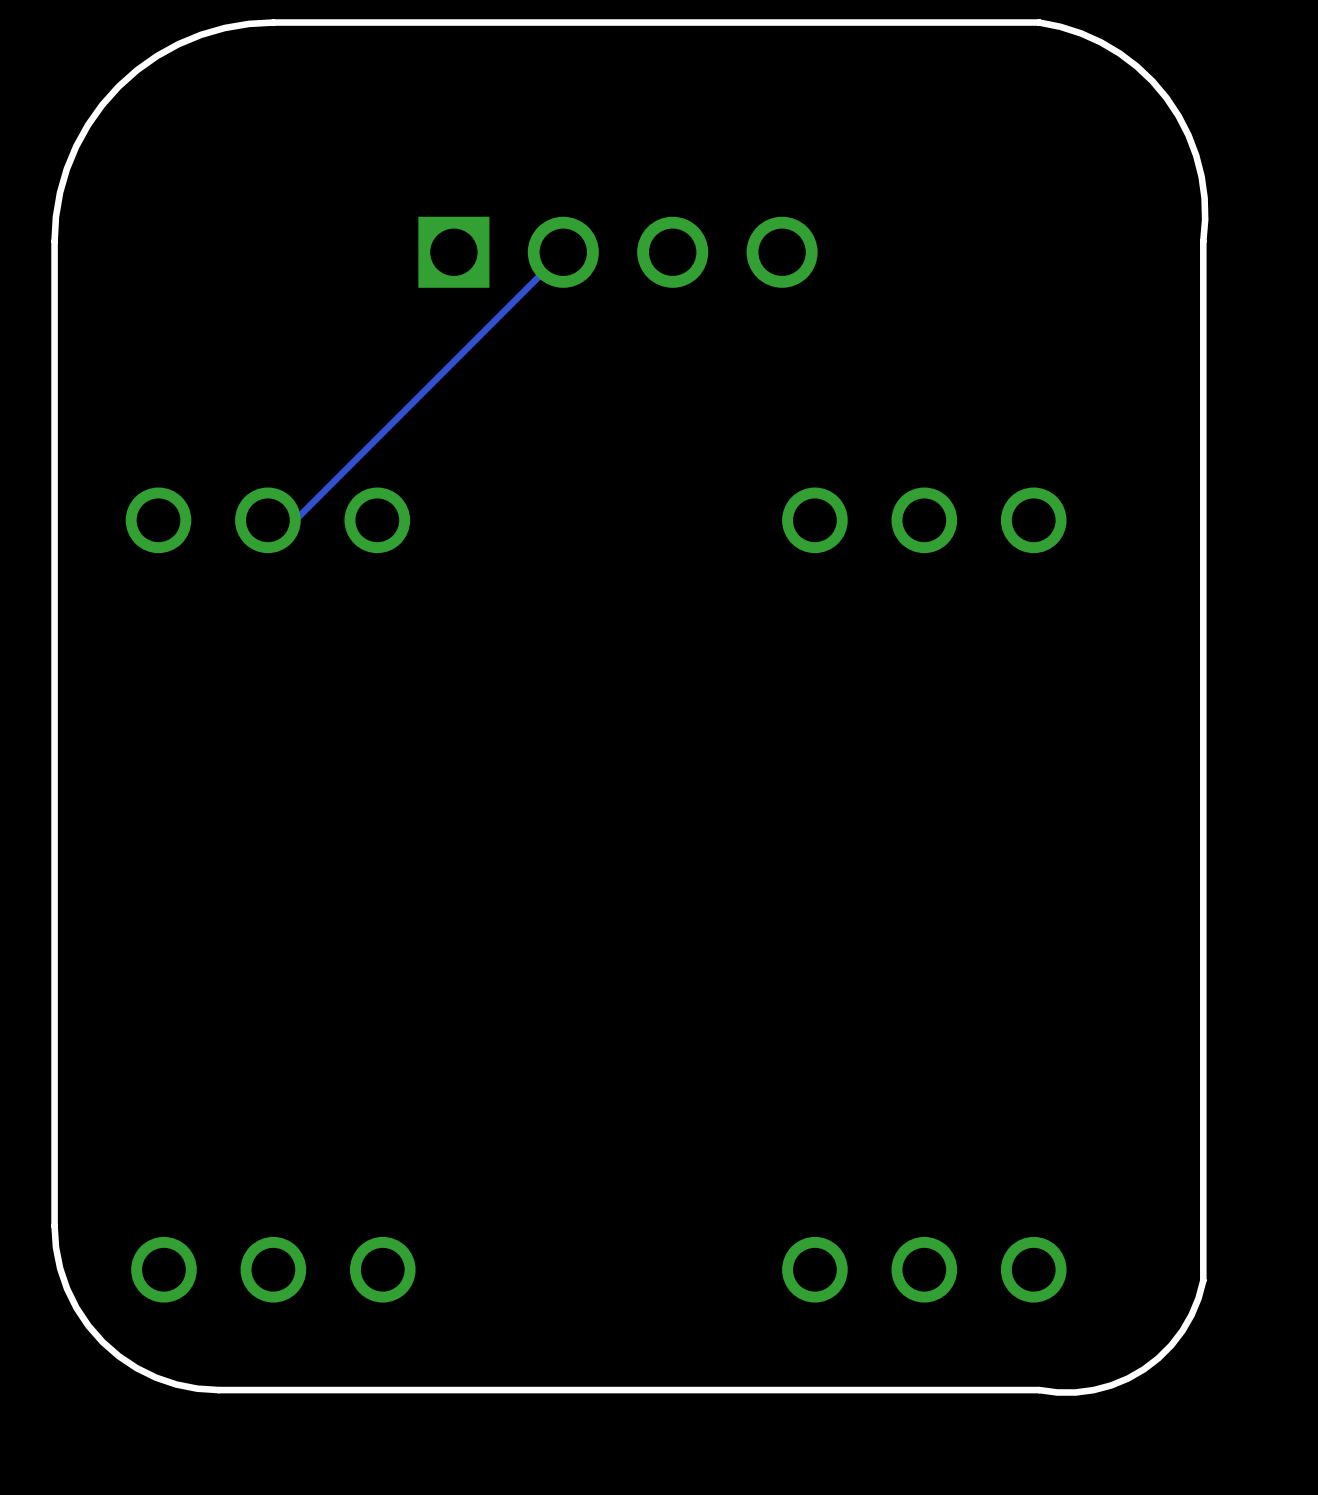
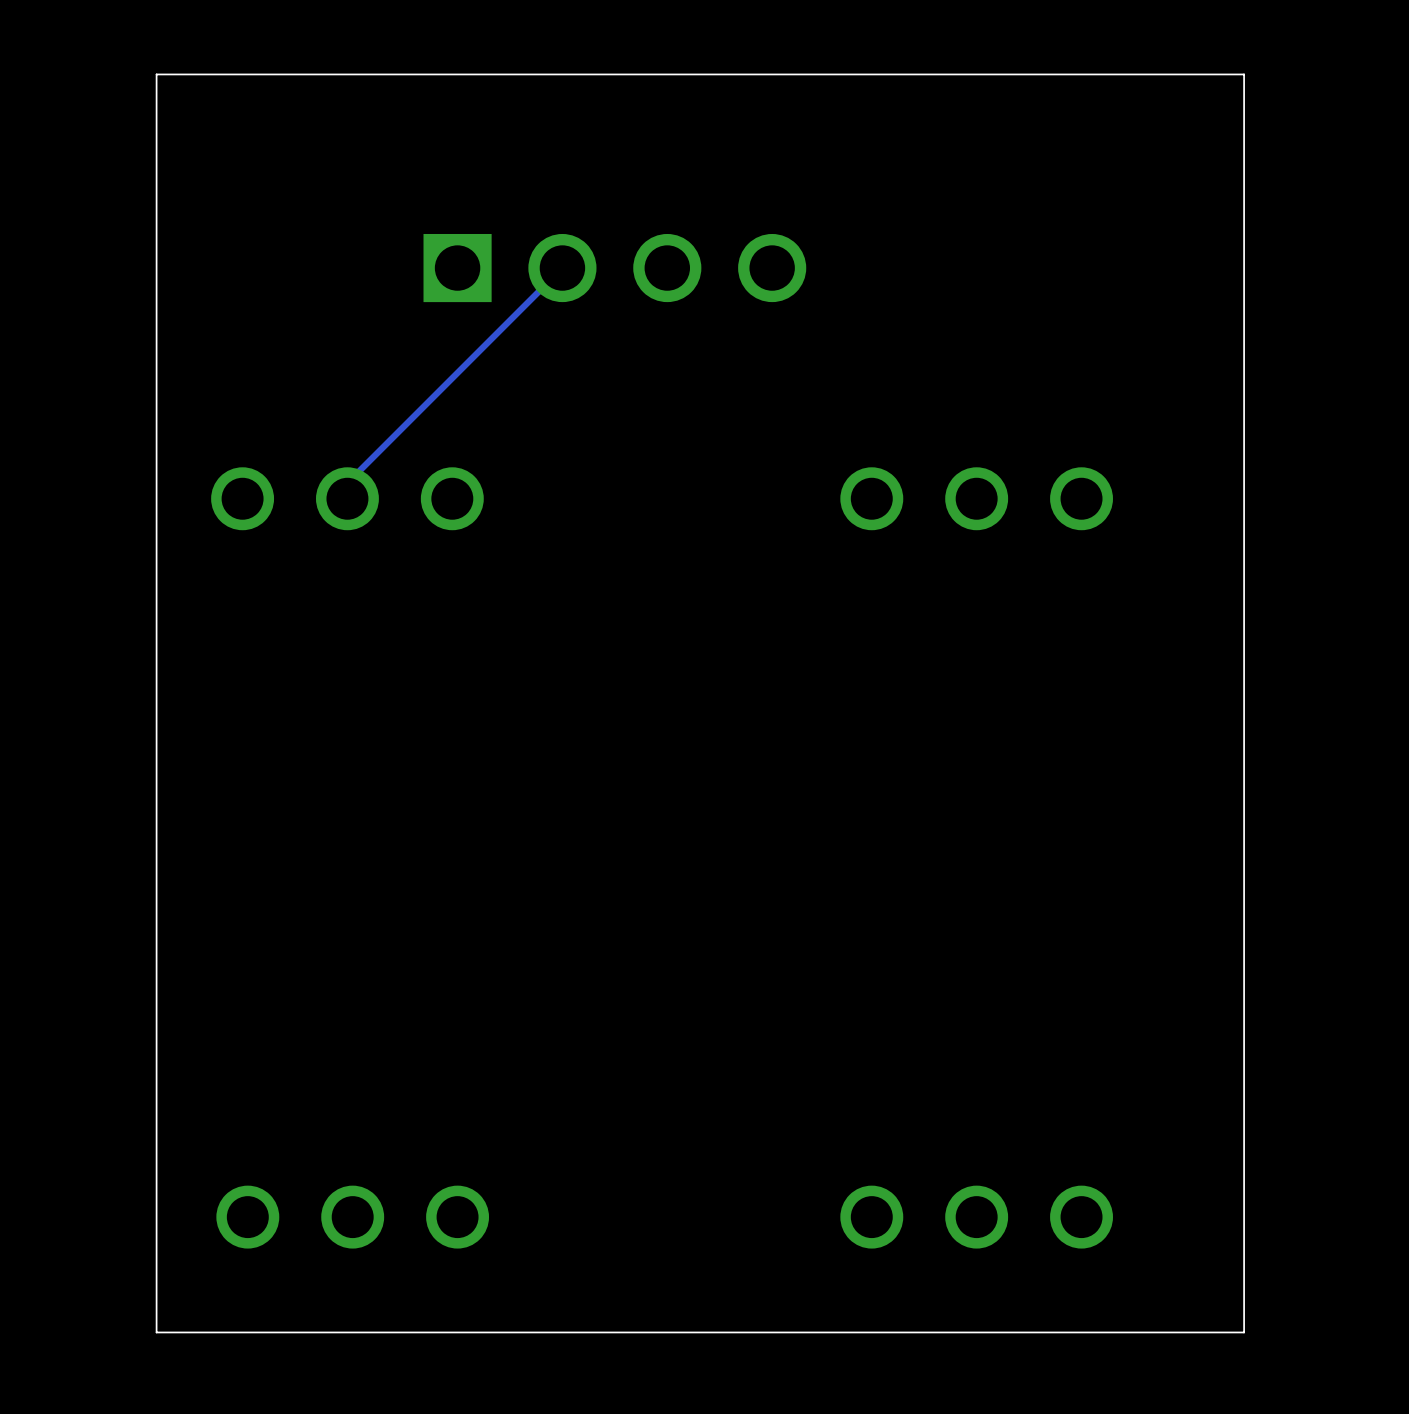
board edge: (1203, 241) (1204, 198) (1201, 176) (1188, 135) (1166, 97) (1136, 66) (1100, 42) (1081, 33) (1039, 22) (248, 23) (201, 34) (156, 56) (118, 86) (102, 104) (88, 124) (66, 169) (55, 216) (54, 241) (55, 1247) (60, 1268) (76, 1308) (102, 1342) (136, 1368) (155, 1377) (176, 1384) (218, 1390) -> (1244, 231) (1244, 74) (156, 74) (156, 1332) (300, 1332)
board edge width: thick (1203, 241) (1203, 1280) -> thin (1244, 231) (1244, 1227)
track: (563, 252) (295, 520) (267, 520) -> (562, 268) (347, 483) (347, 498)
part position: (617, 252) -> (614, 268)
board edge: (1203, 1280) (1198, 1298) (1182, 1330) (1158, 1358) (1143, 1369) (1128, 1378) (1093, 1390) (1075, 1392) (1039, 1390) -> (1244, 1227) (1244, 1332) (1086, 1332)
board edge width: thick (1039, 1390) (218, 1390) -> thin (1086, 1332) (300, 1332)

